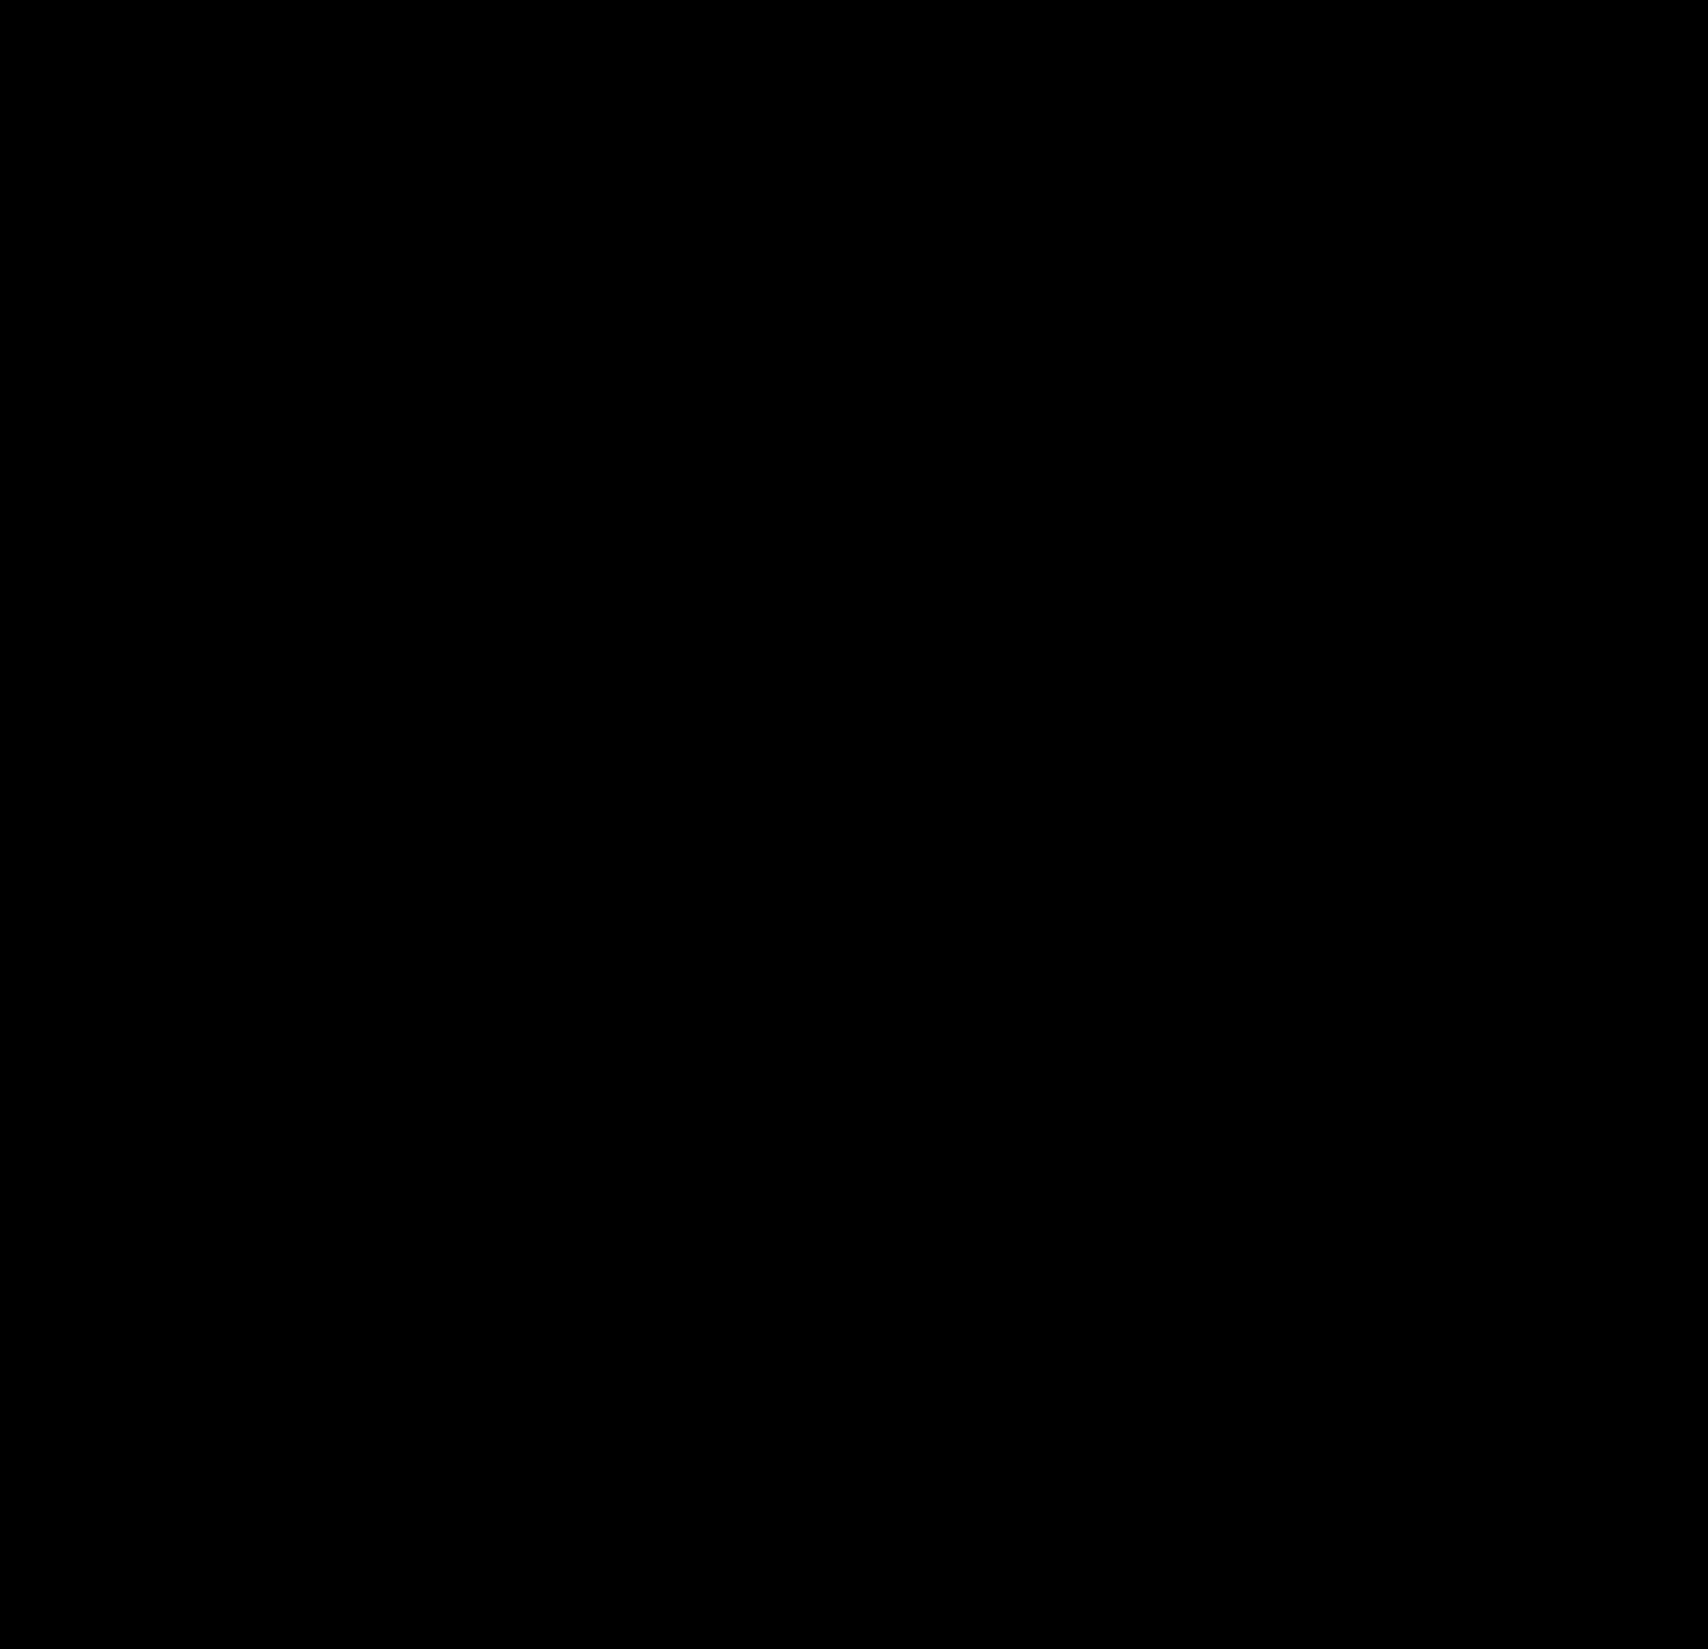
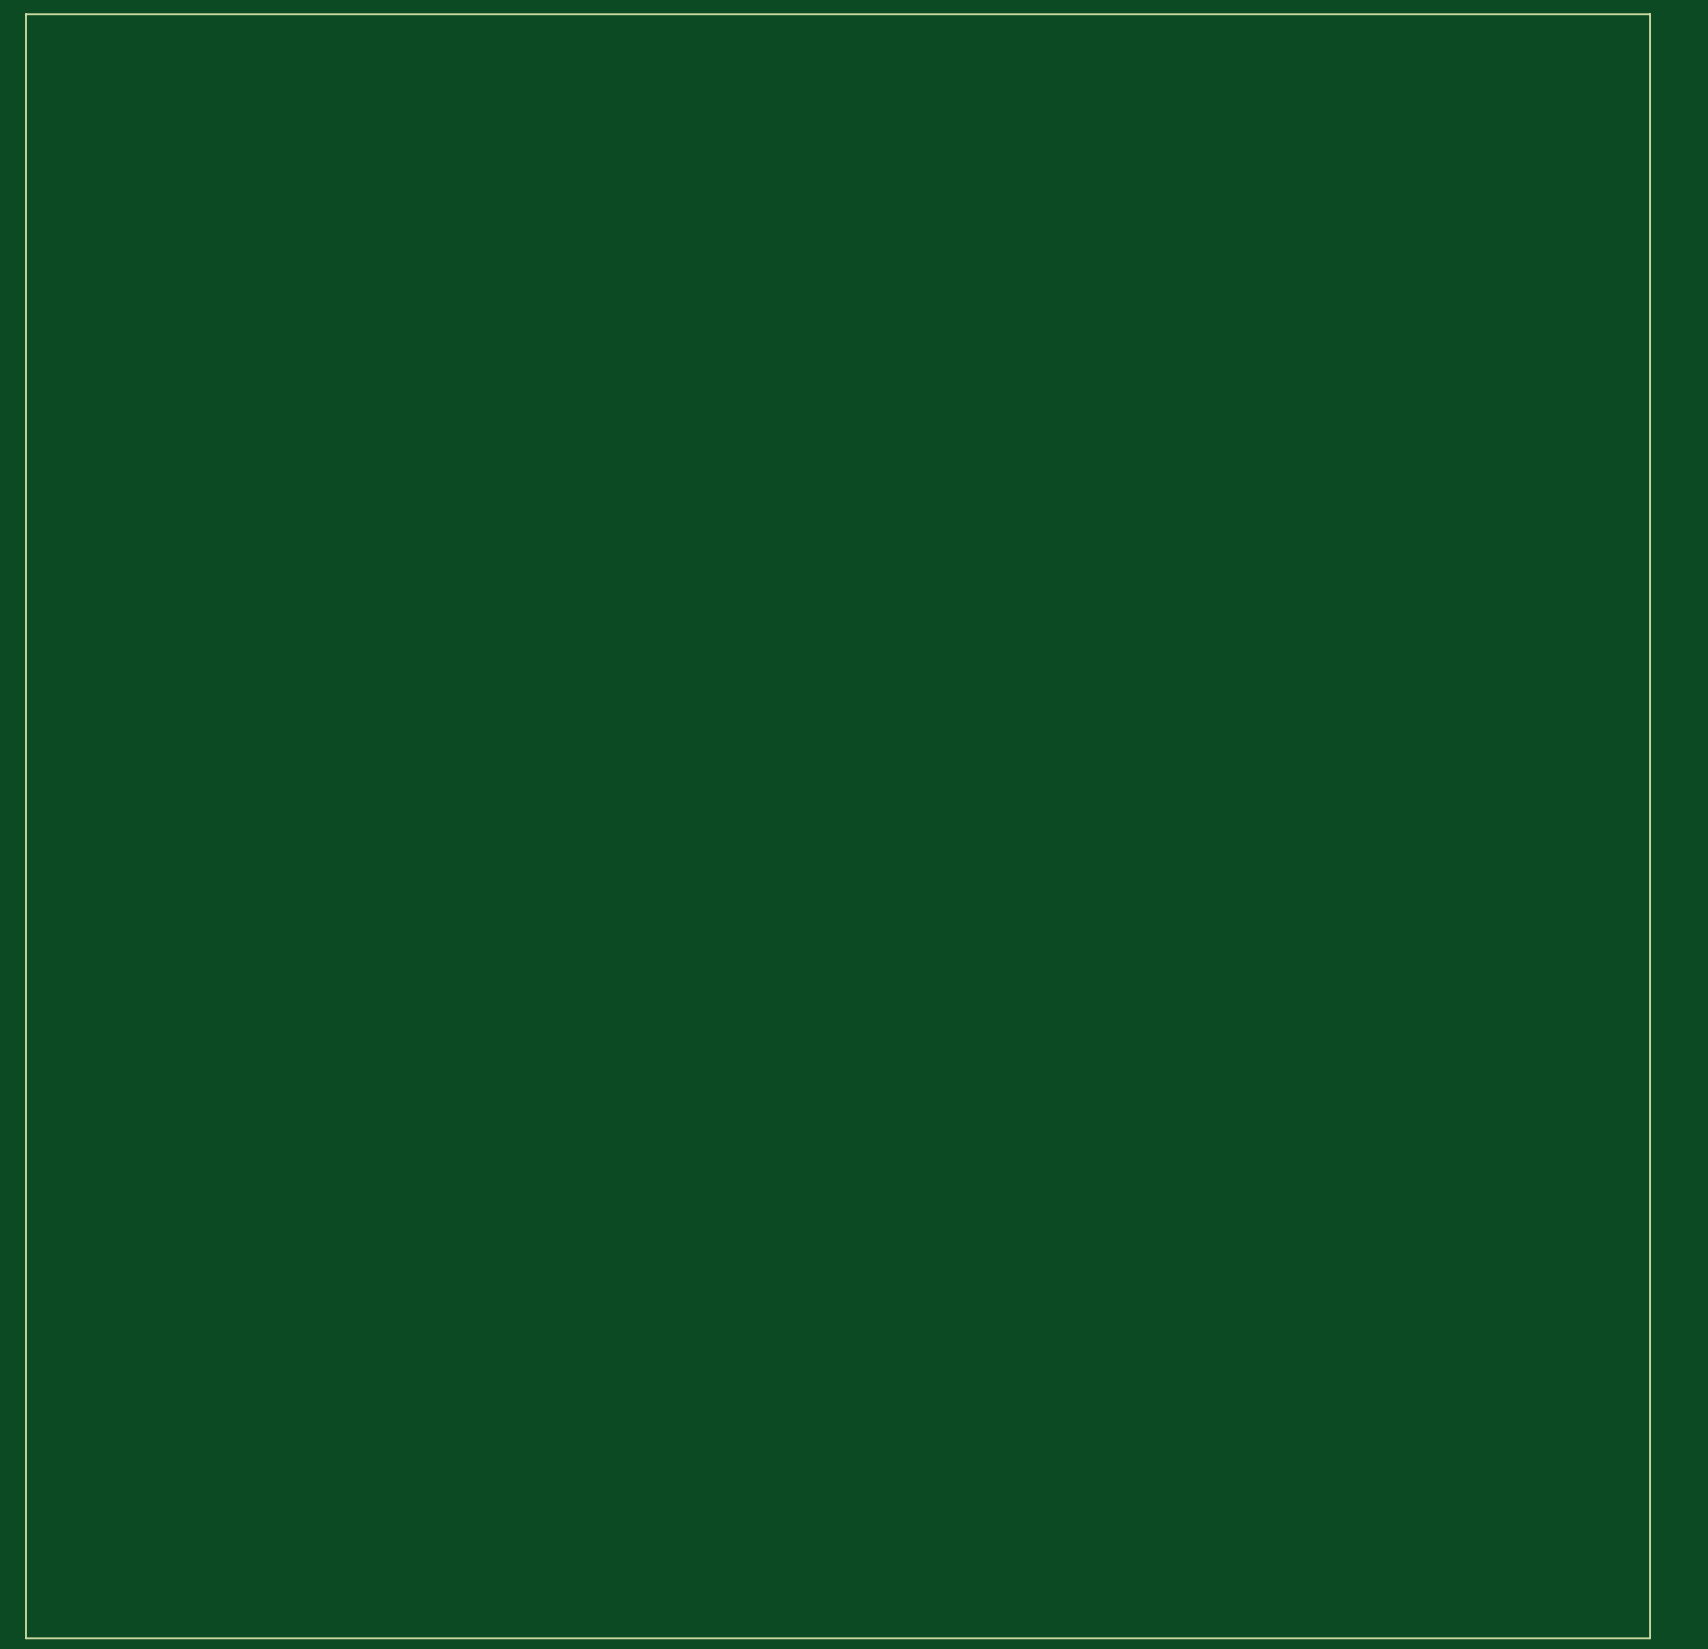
board edge: none -> (25, 14) (1650, 14) (1650, 1638) (25, 1638) (25, 14)

